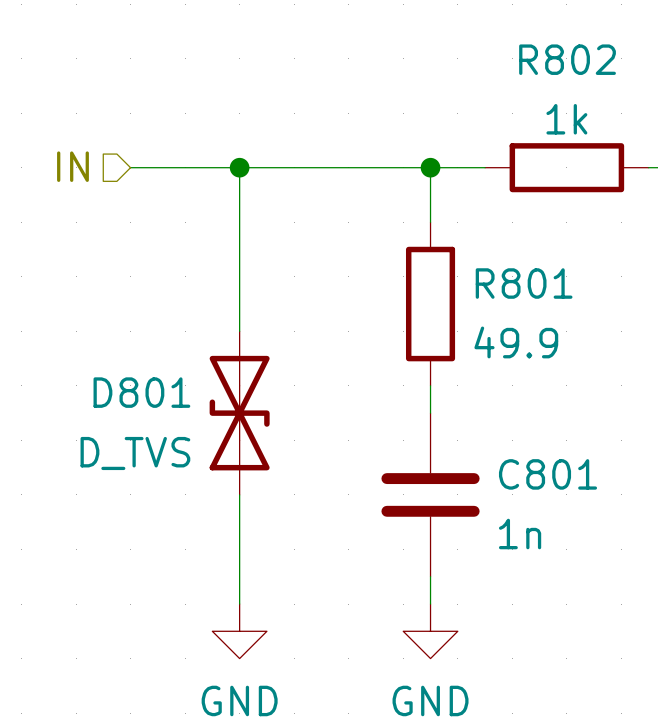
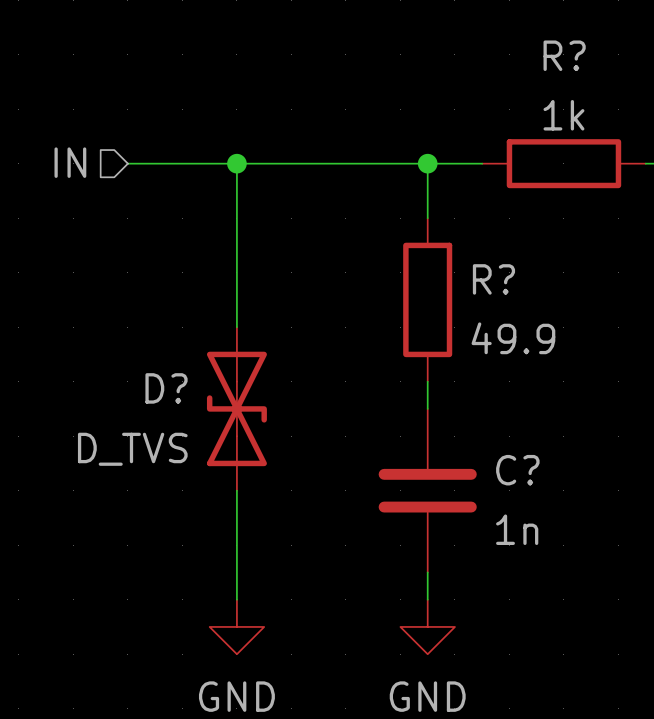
R802 name: R802 (567, 59) -> R? (564, 55)
R801 name: R801 (524, 283) -> R? (493, 279)
D801 name: D801 (141, 392) -> D? (166, 388)
C801 name: C801 (547, 474) -> C? (517, 470)

